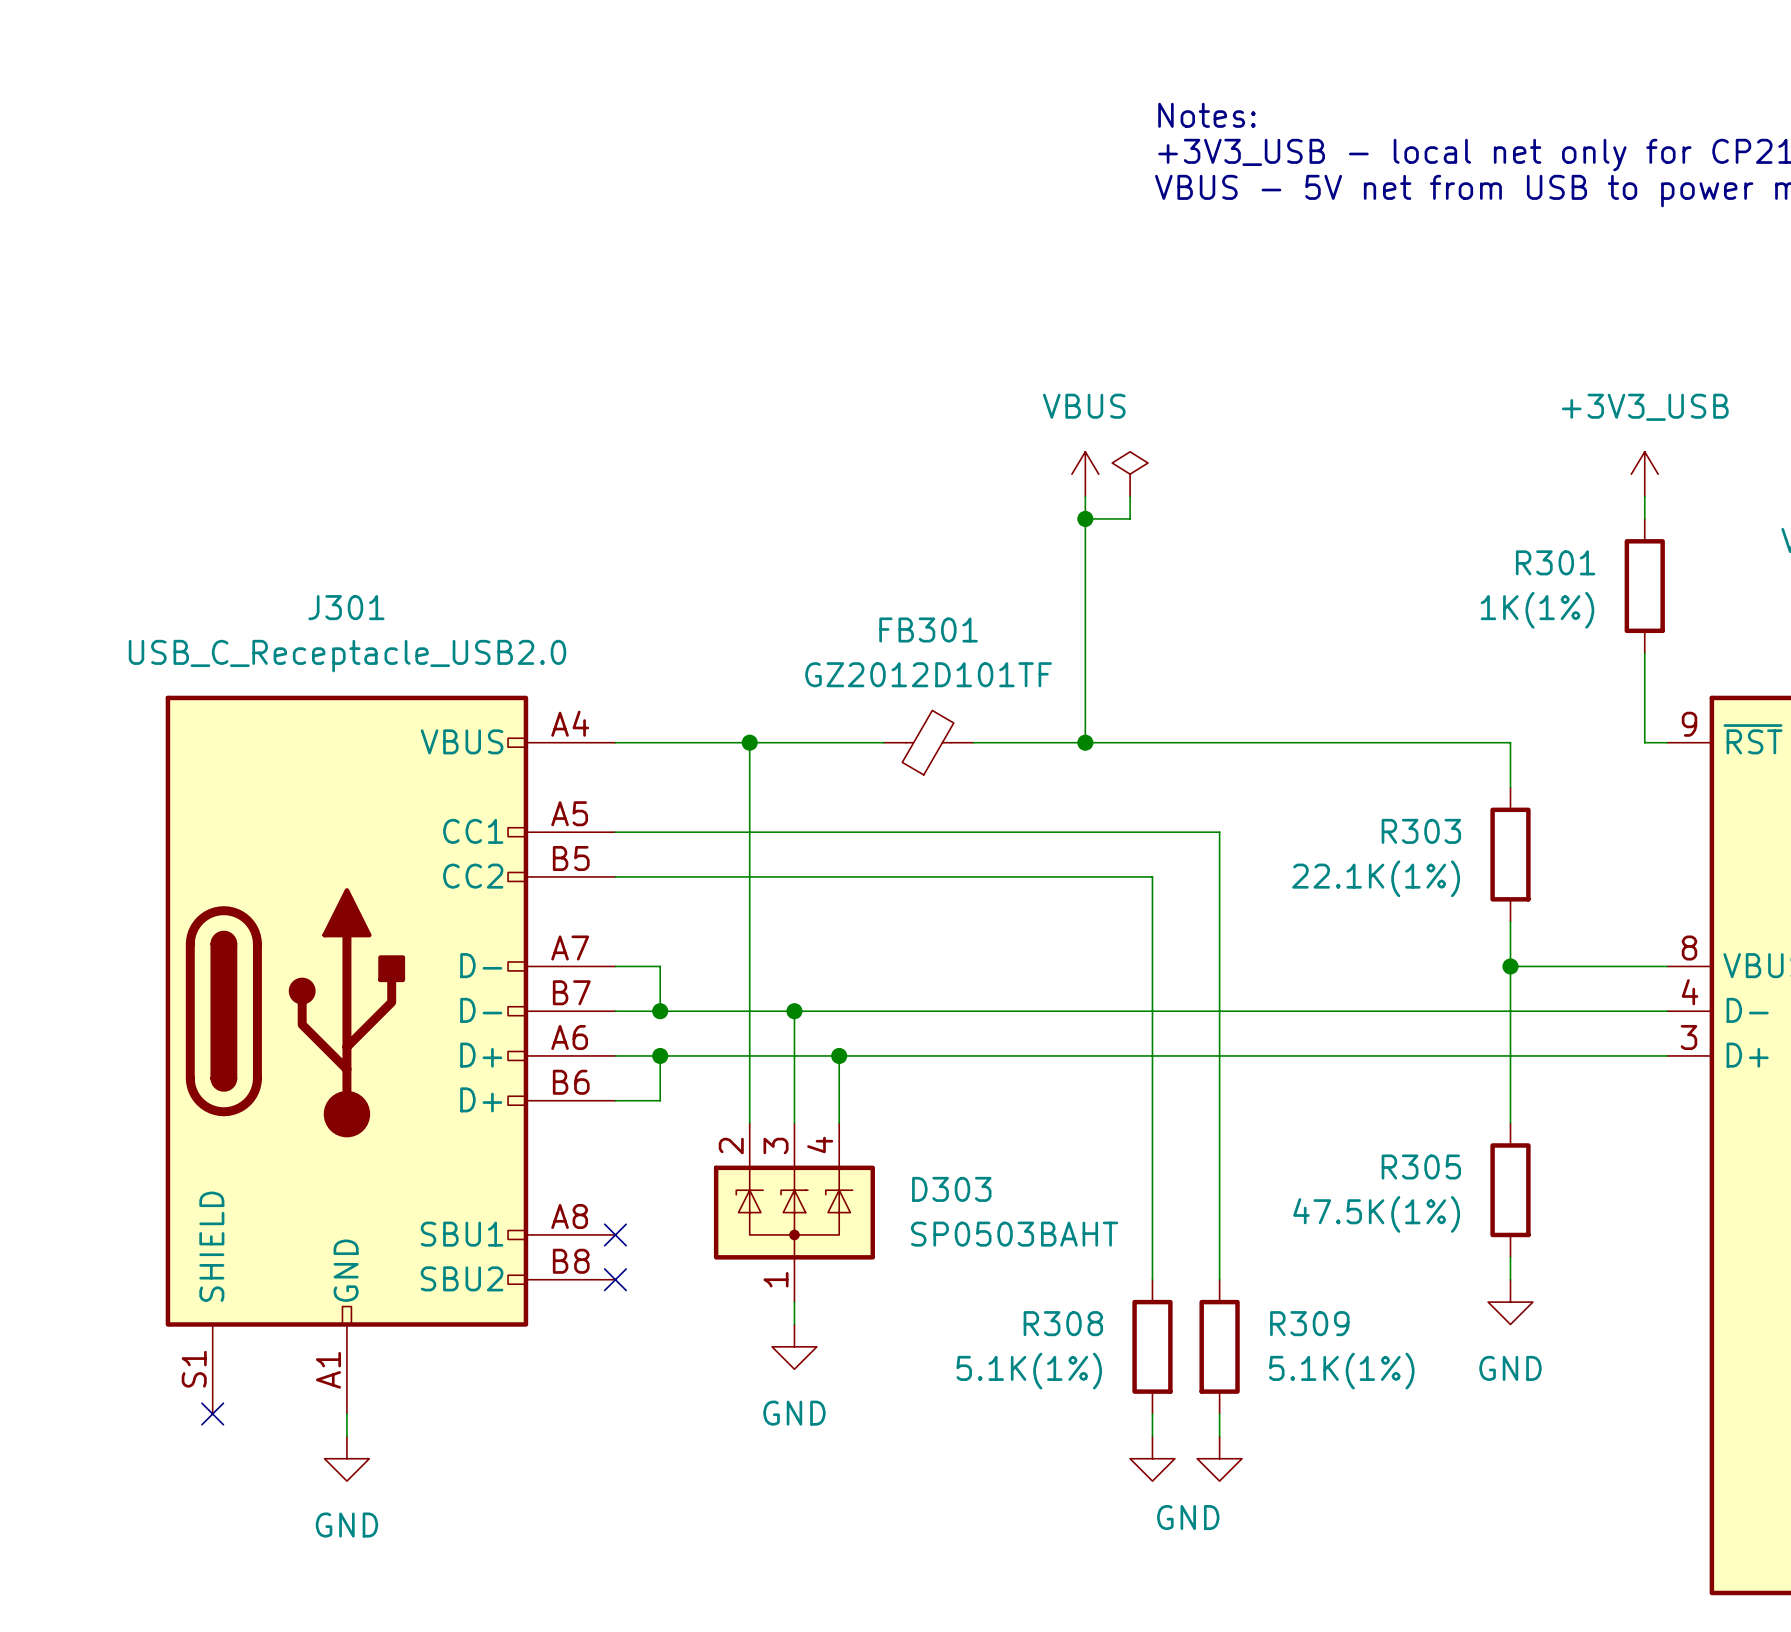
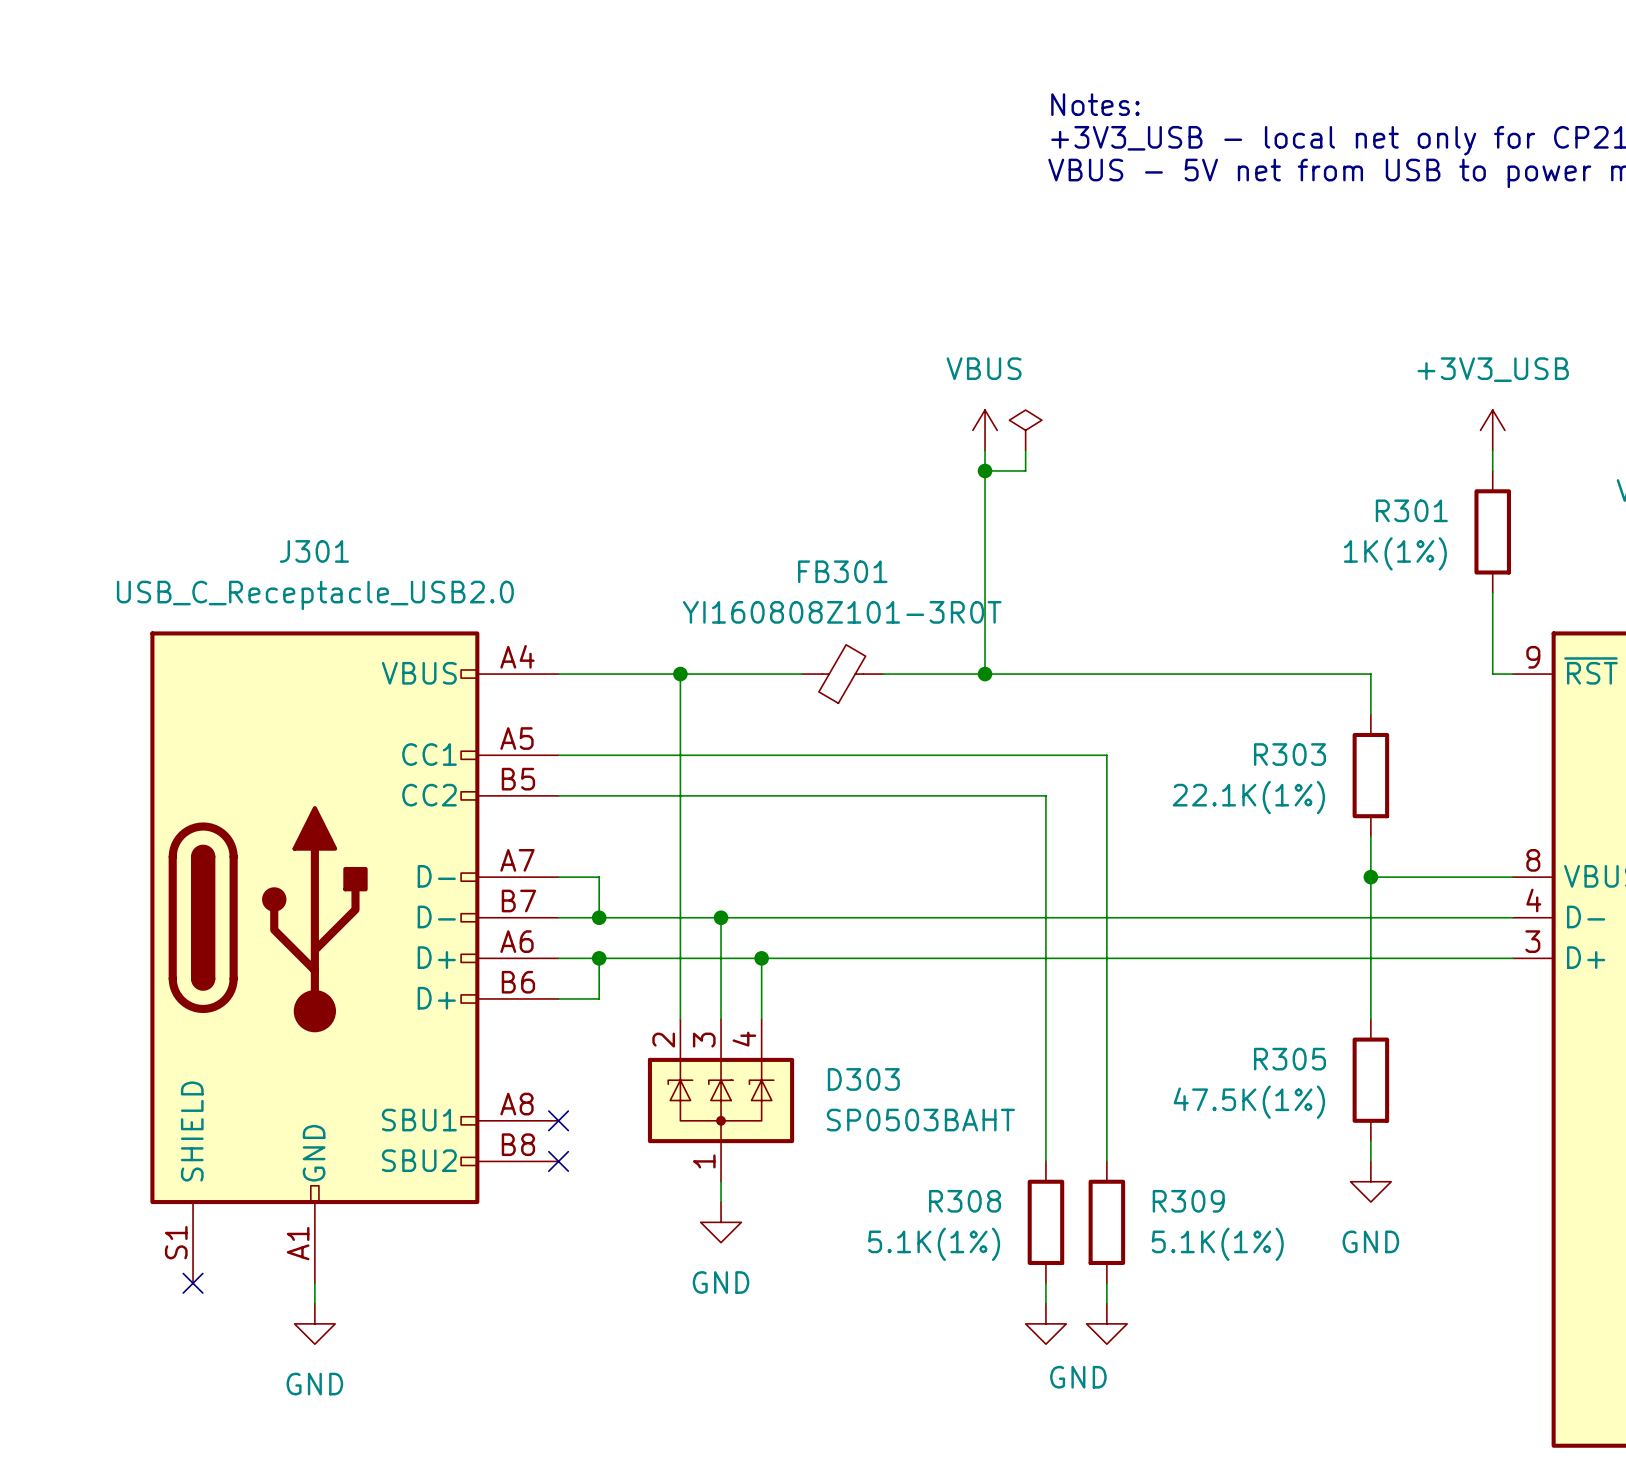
FB301 value: GZ2012D101TF (928, 674) -> YI160808Z101-3R0T (842, 612)

